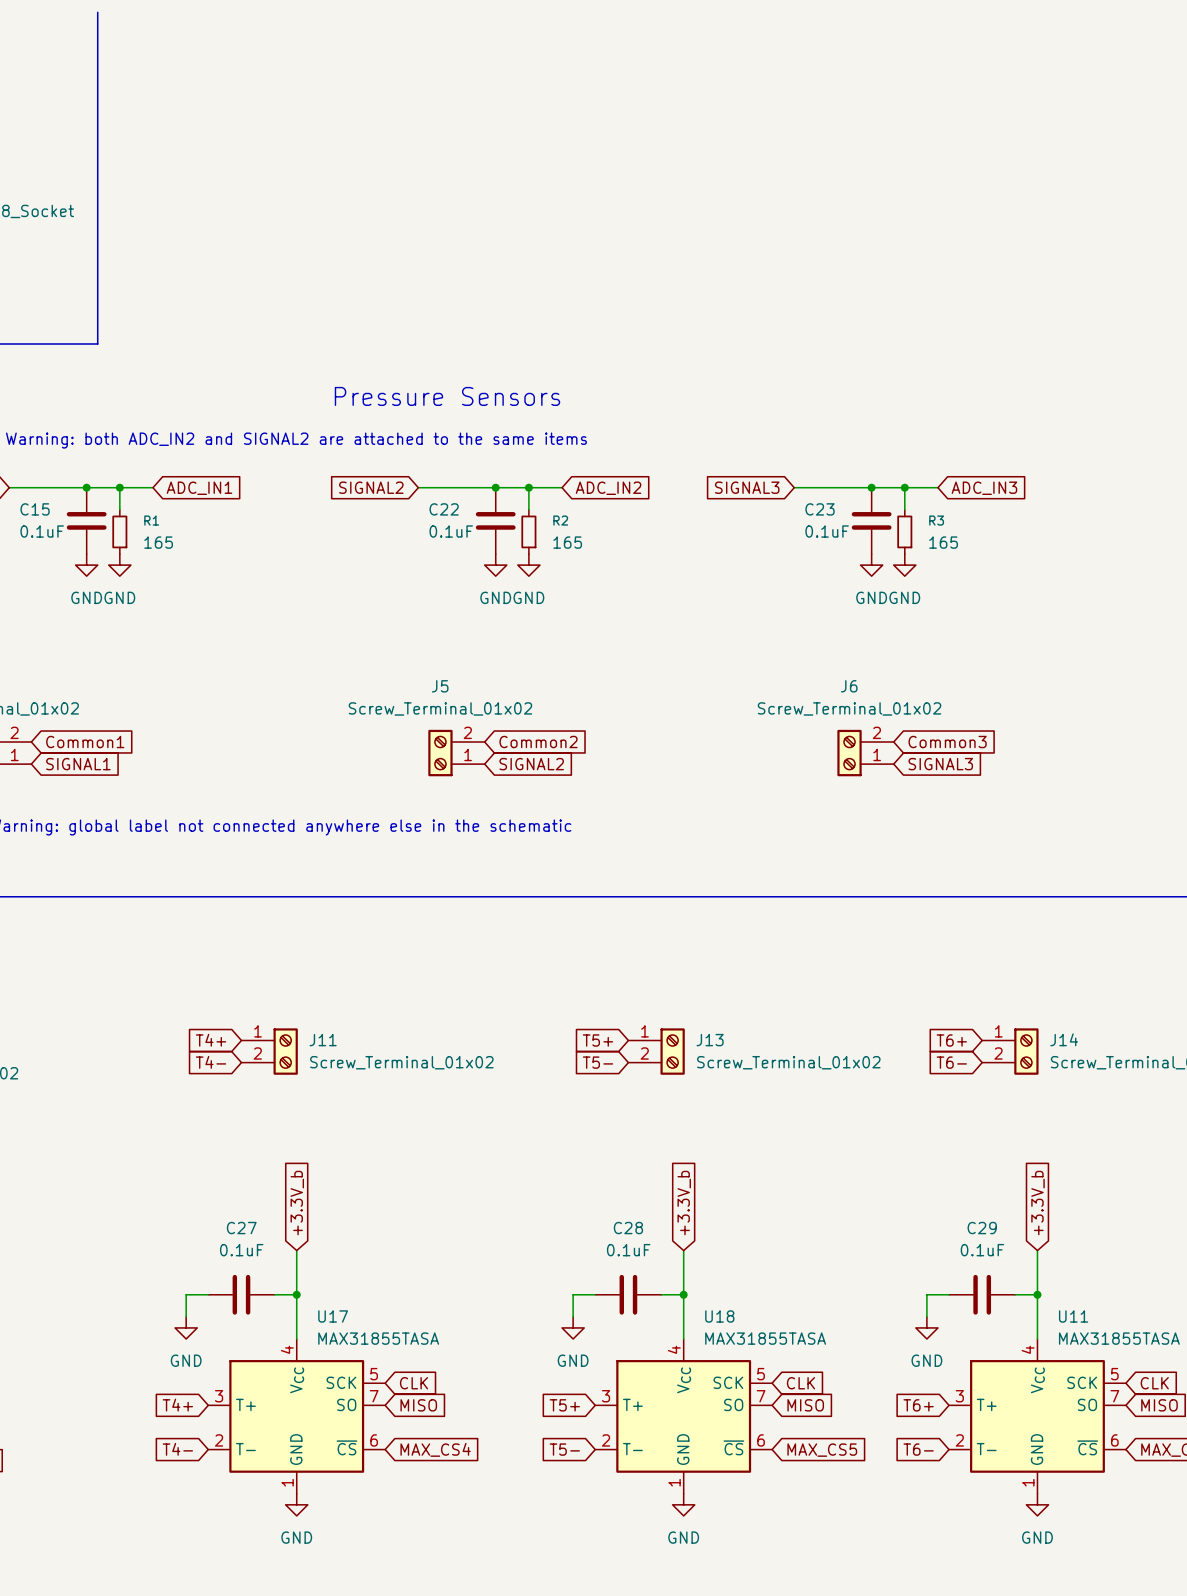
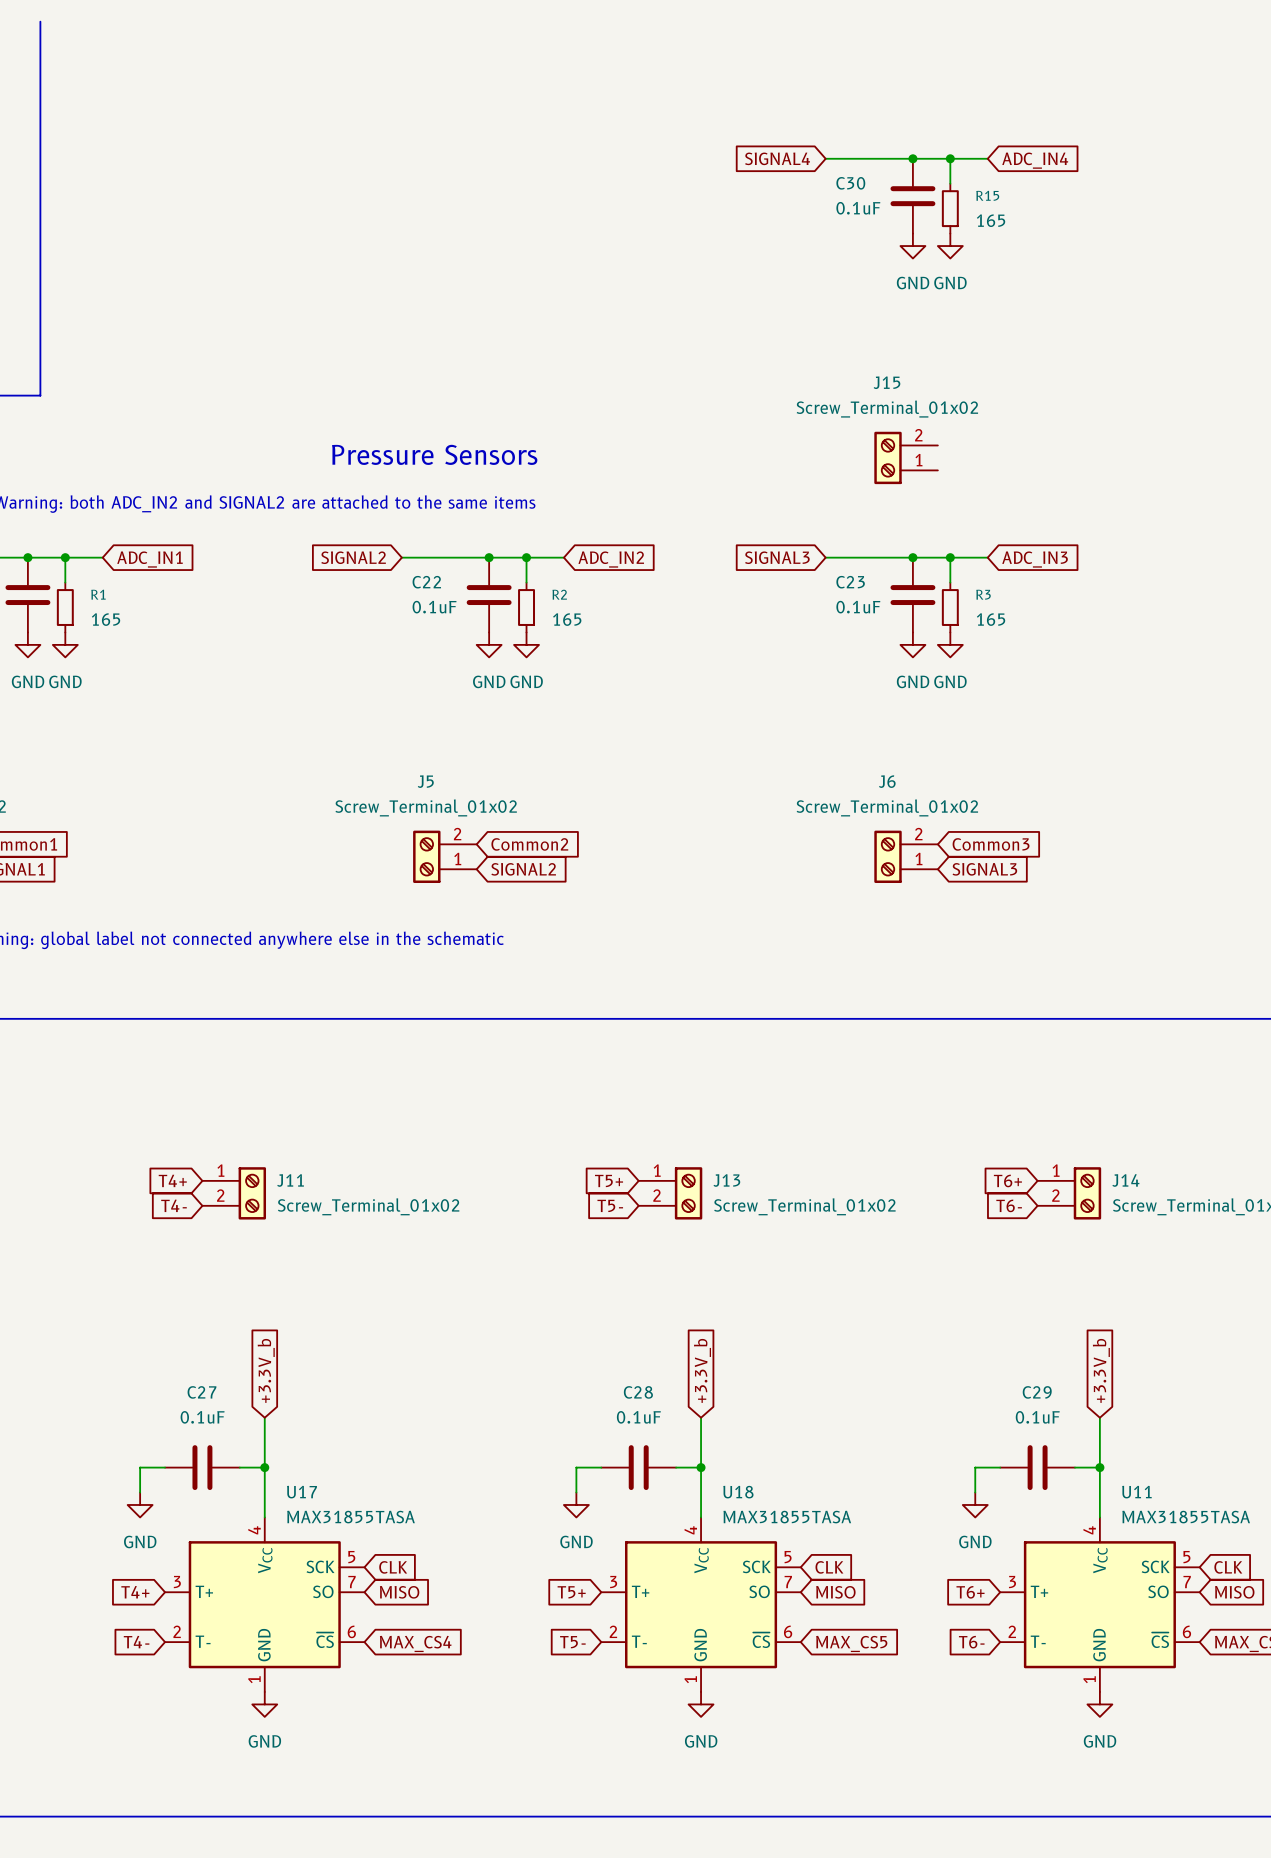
global label: none -> SIGNAL4 (777, 158)
wire: none -> (825, 158) (987, 158)
junction: none -> (912, 158)
wire: none -> (950, 158) (950, 183)
junction: none -> (950, 158)
global label: none -> ADC_IN4 (1035, 160)
C30: none -> 0.1uF (912, 196)
R15: none -> 165 (950, 208)
power symbol: none -> GND (912, 246)
power symbol: none -> GND (950, 246)
J15: none -> Screw_Terminal_01x02 (906, 457)

